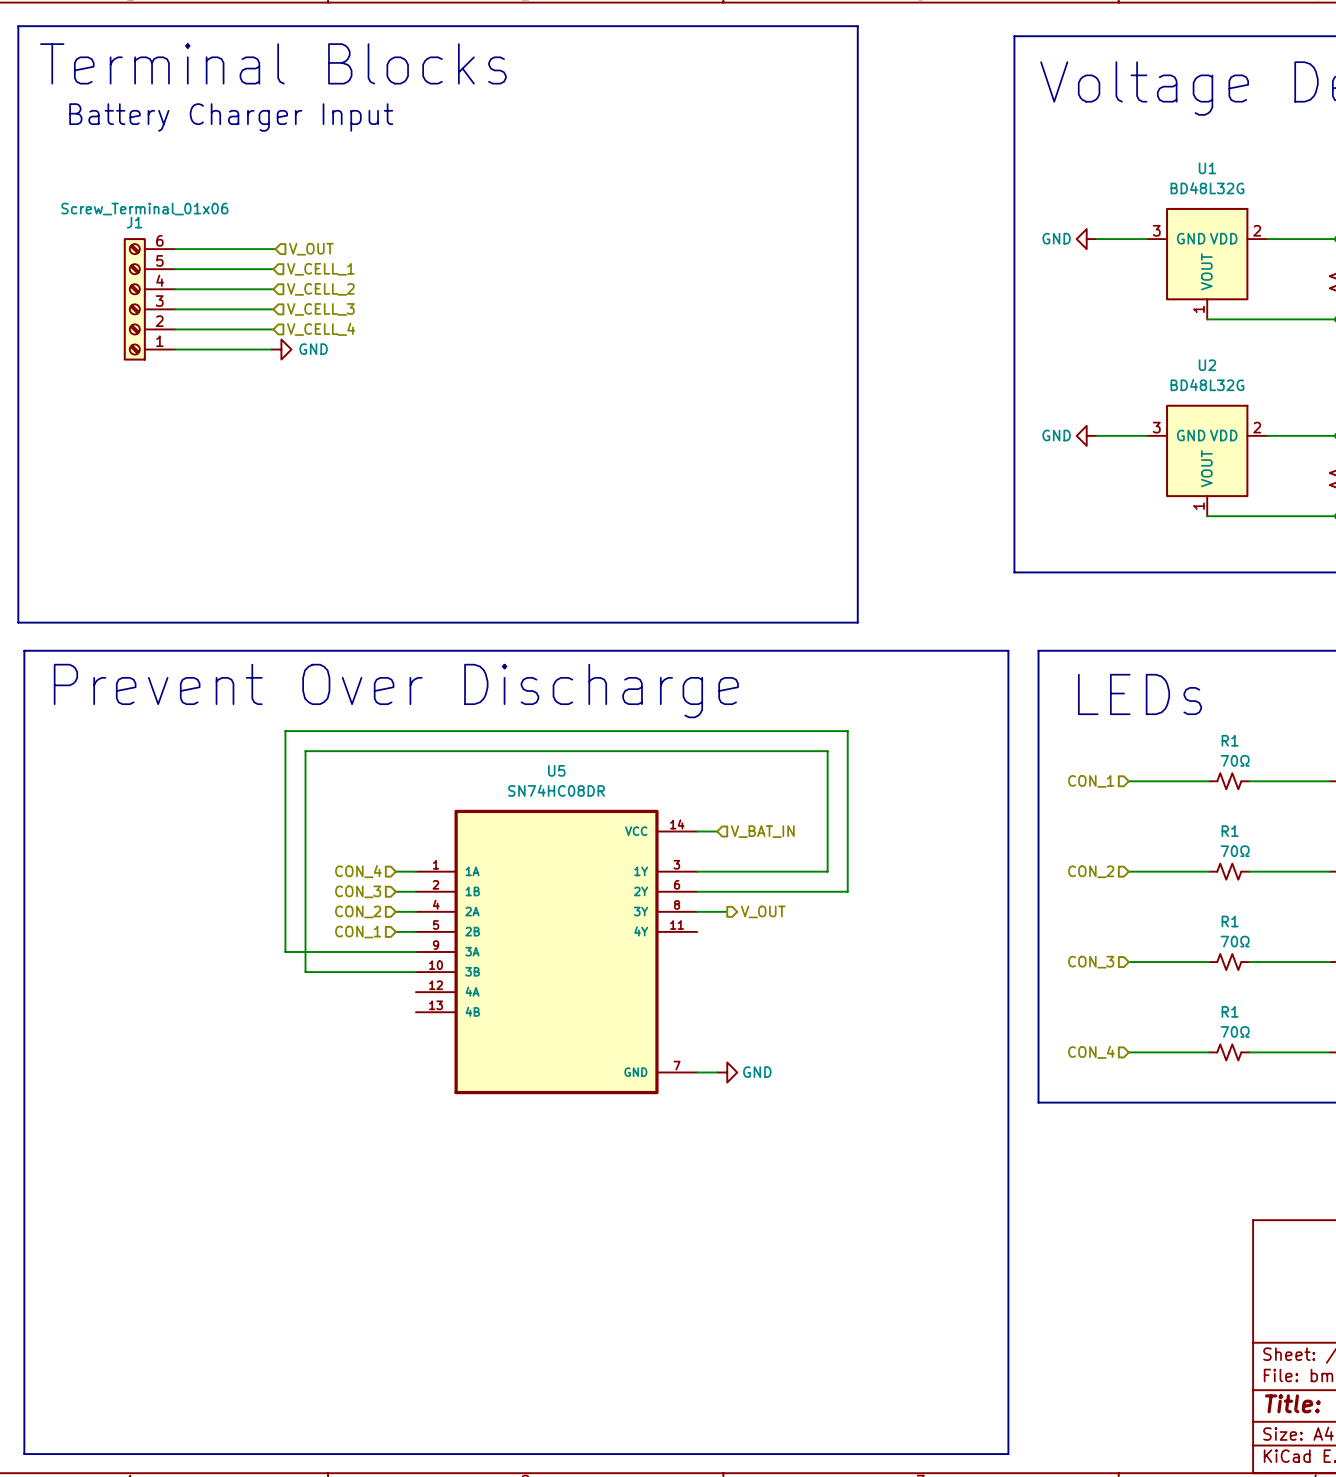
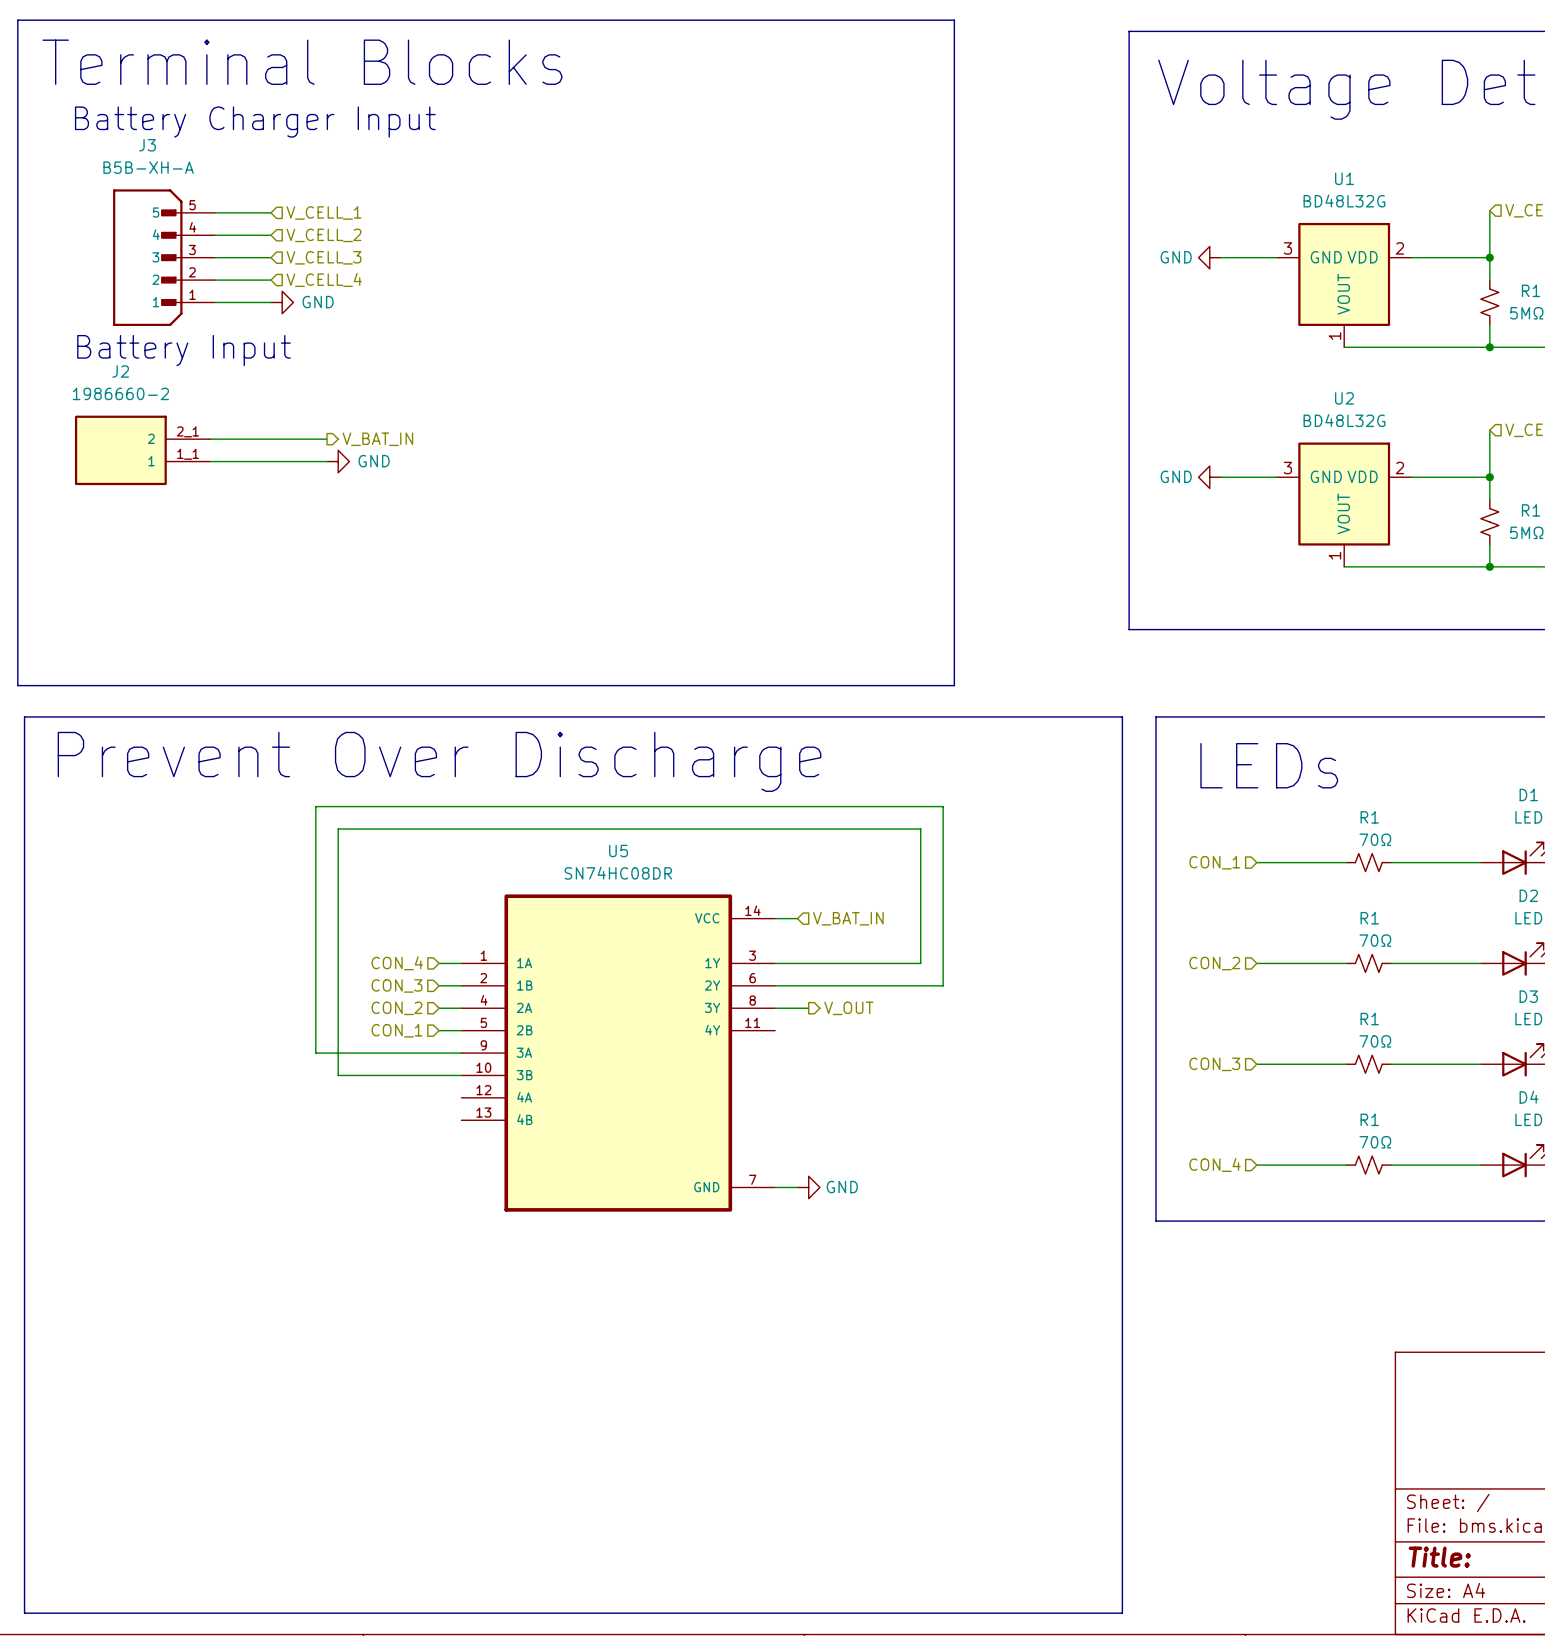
wire: none -> (214, 212) (271, 212)
wire: none -> (214, 235) (271, 235)
J3: none -> B5B-XH-A (164, 257)
wire: none -> (214, 257) (271, 257)
wire: (174, 249) (275, 249) -> none
hierarchical label: V_OUT (311, 249) -> none
wire: none -> (214, 280) (271, 280)
wire: (174, 269) (273, 269) -> none
hierarchical label position: V_CELL_1 (320, 269) -> V_CELL_1 (323, 212)
wire: none -> (214, 302) (271, 302)
power symbol: none -> GND (282, 302)
wire: (174, 289) (273, 289) -> none
hierarchical label position: V_CELL_2 (320, 289) -> V_CELL_2 (323, 235)
J1: Screw_Terminal_01x06 (149, 299) -> none
wire: (174, 309) (273, 309) -> none
hierarchical label position: V_CELL_3 (320, 309) -> V_CELL_3 (323, 257)
text: none -> Battery Input (183, 350)
wire: (174, 329) (273, 329) -> none
hierarchical label position: V_CELL_4 (321, 329) -> V_CELL_4 (324, 279)
wire: (174, 349) (271, 349) -> none
power symbol: GND (281, 349) -> none
wire: none -> (210, 439) (327, 439)
hierarchical label: none -> V_BAT_IN (377, 439)
J2: none -> 1986660-2 (142, 450)
wire: none -> (210, 461) (327, 461)
power symbol: none -> GND (338, 461)

